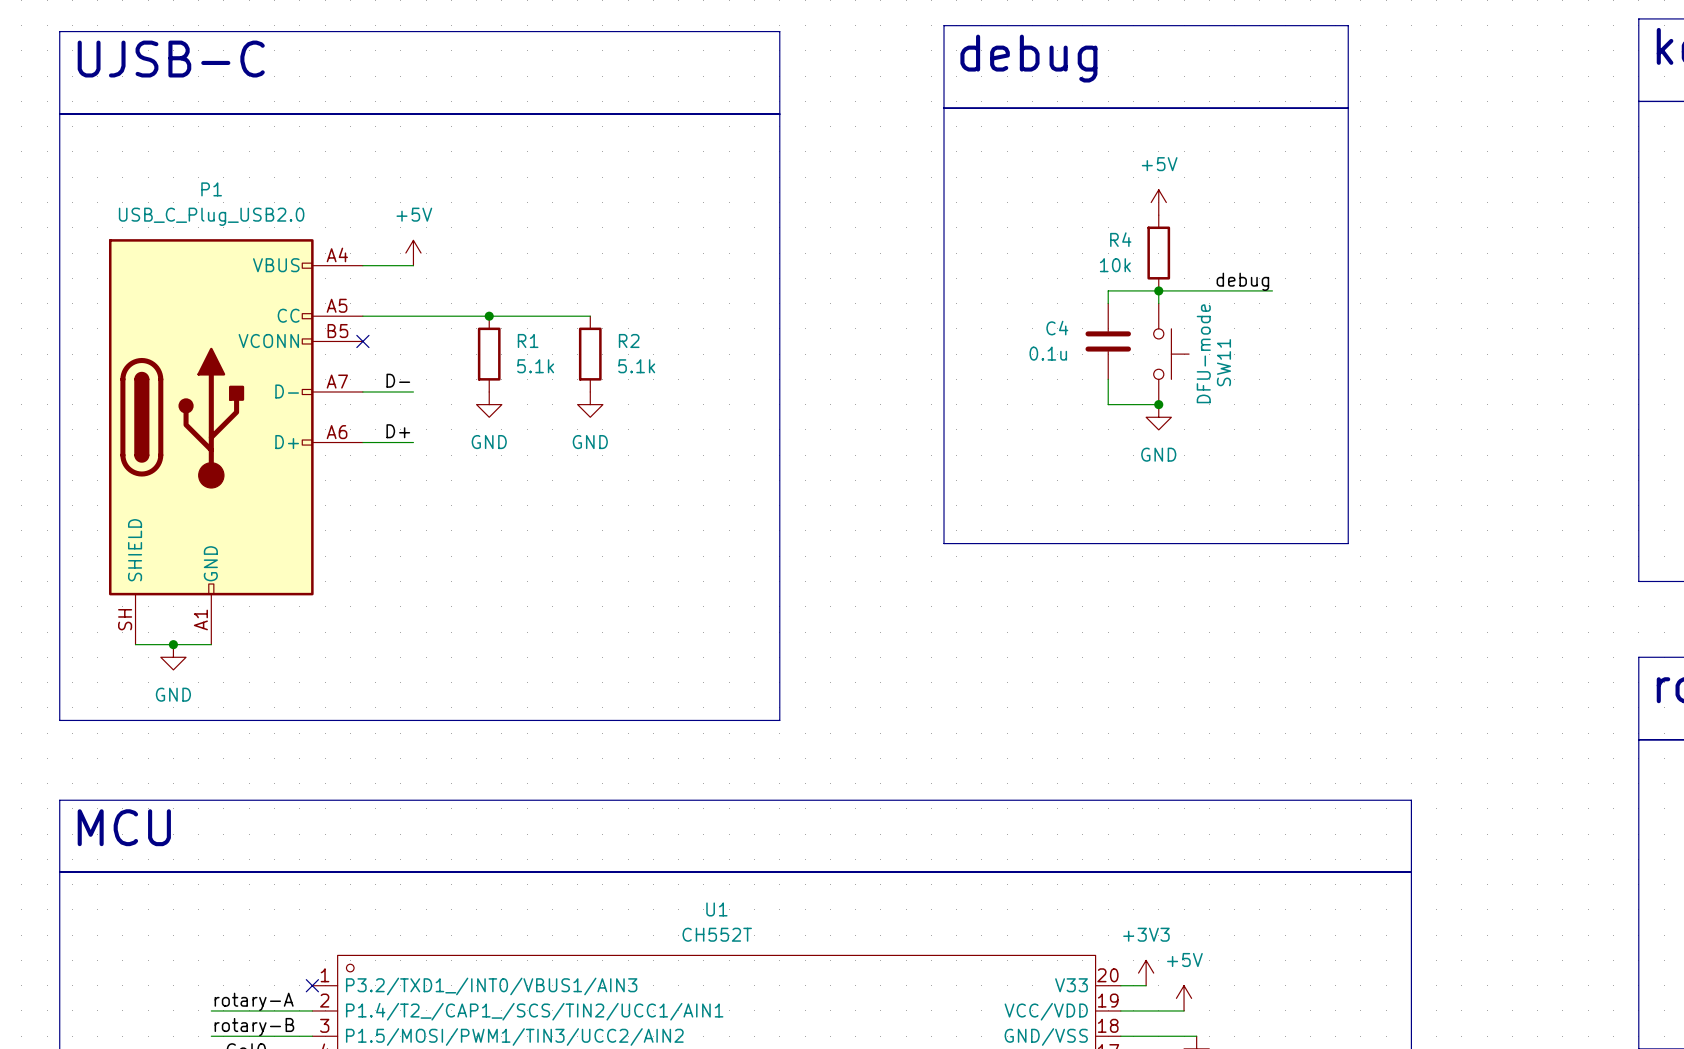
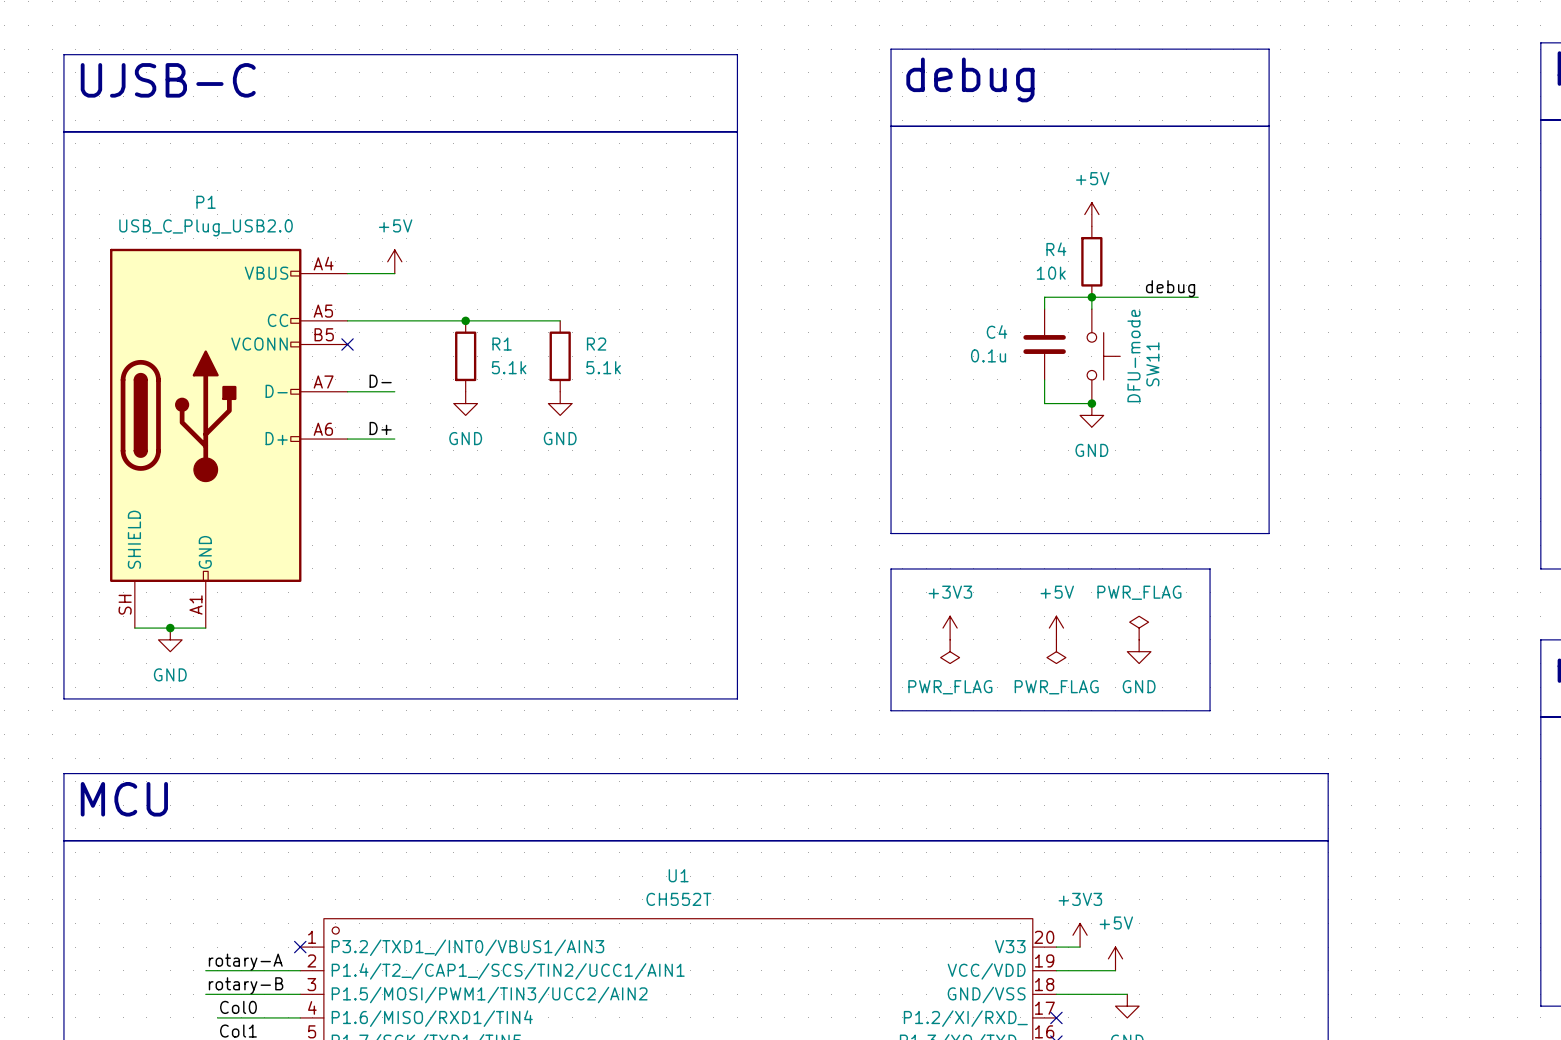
line: none -> (891, 568) (1210, 568) (1210, 710) (891, 710) (891, 568)
power symbol: none -> +3V3 (950, 628)
power symbol: none -> +5V (1056, 628)
power symbol: none -> PWR_FLAG (1139, 628)
power symbol: none -> PWR_FLAG (950, 651)
power symbol: none -> PWR_FLAG (1056, 651)
power symbol: none -> GND (1139, 651)

